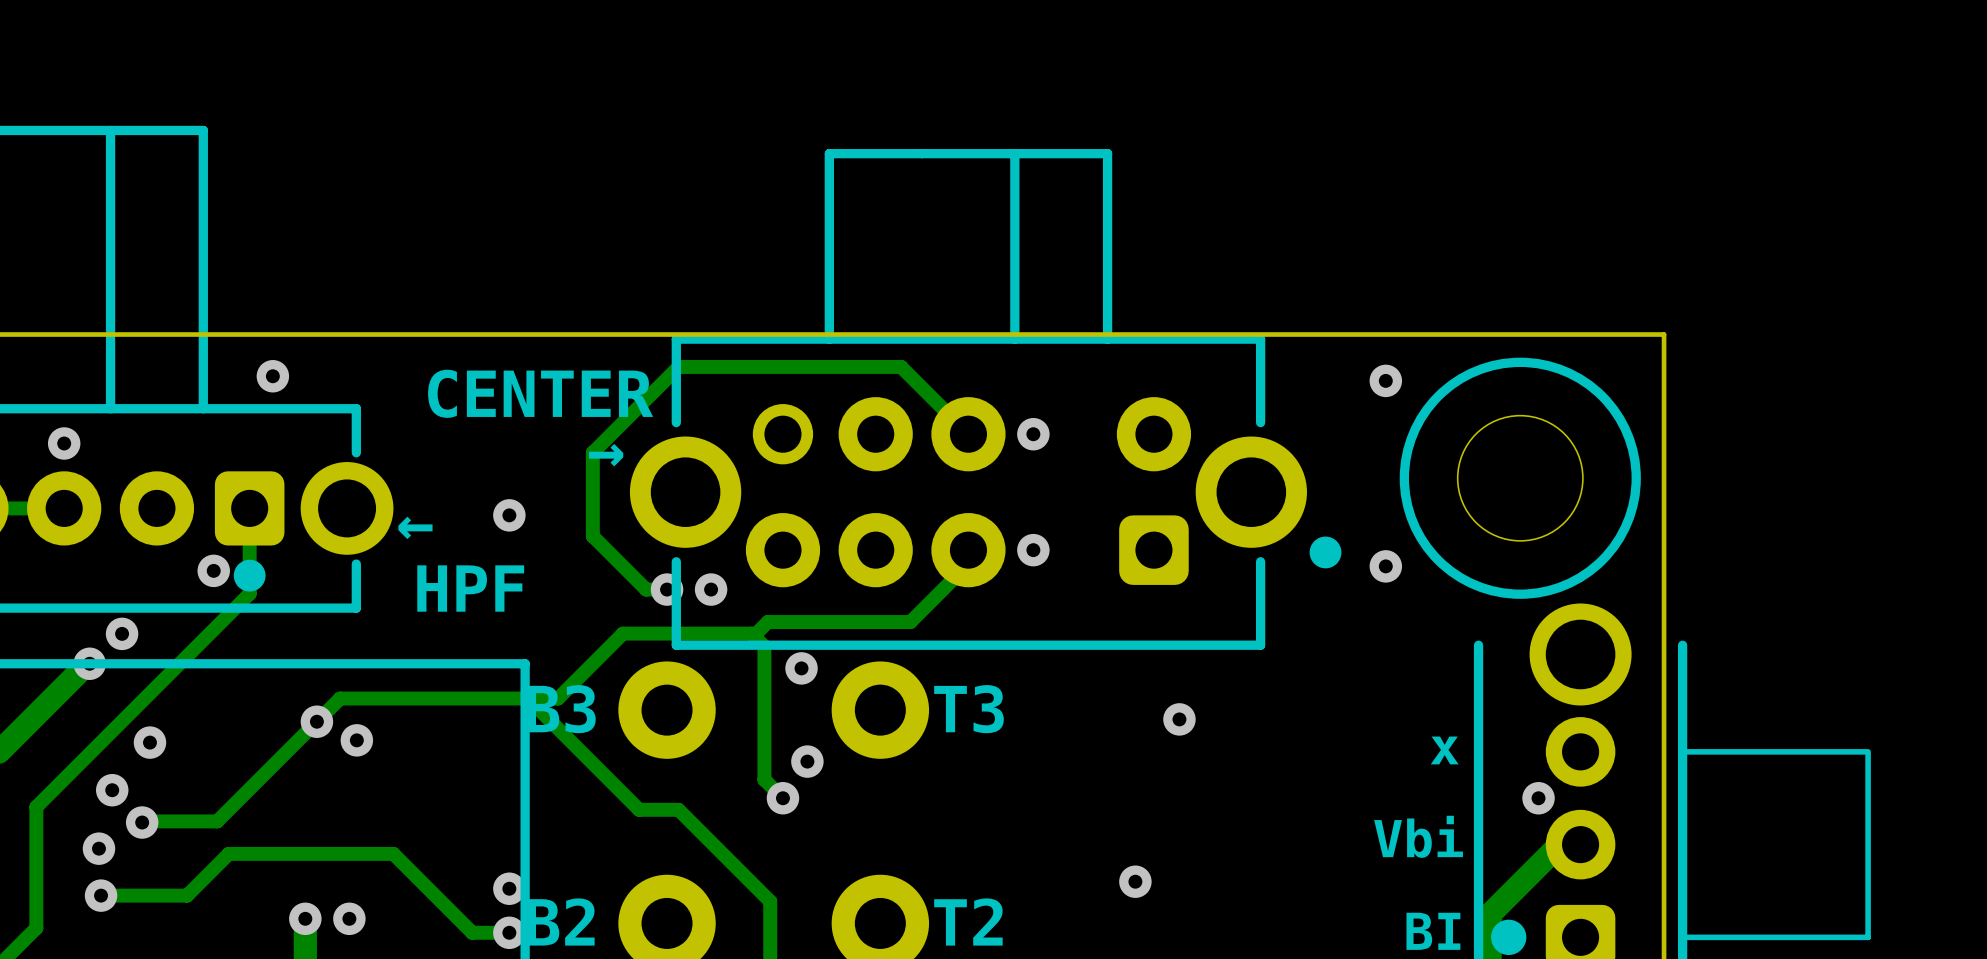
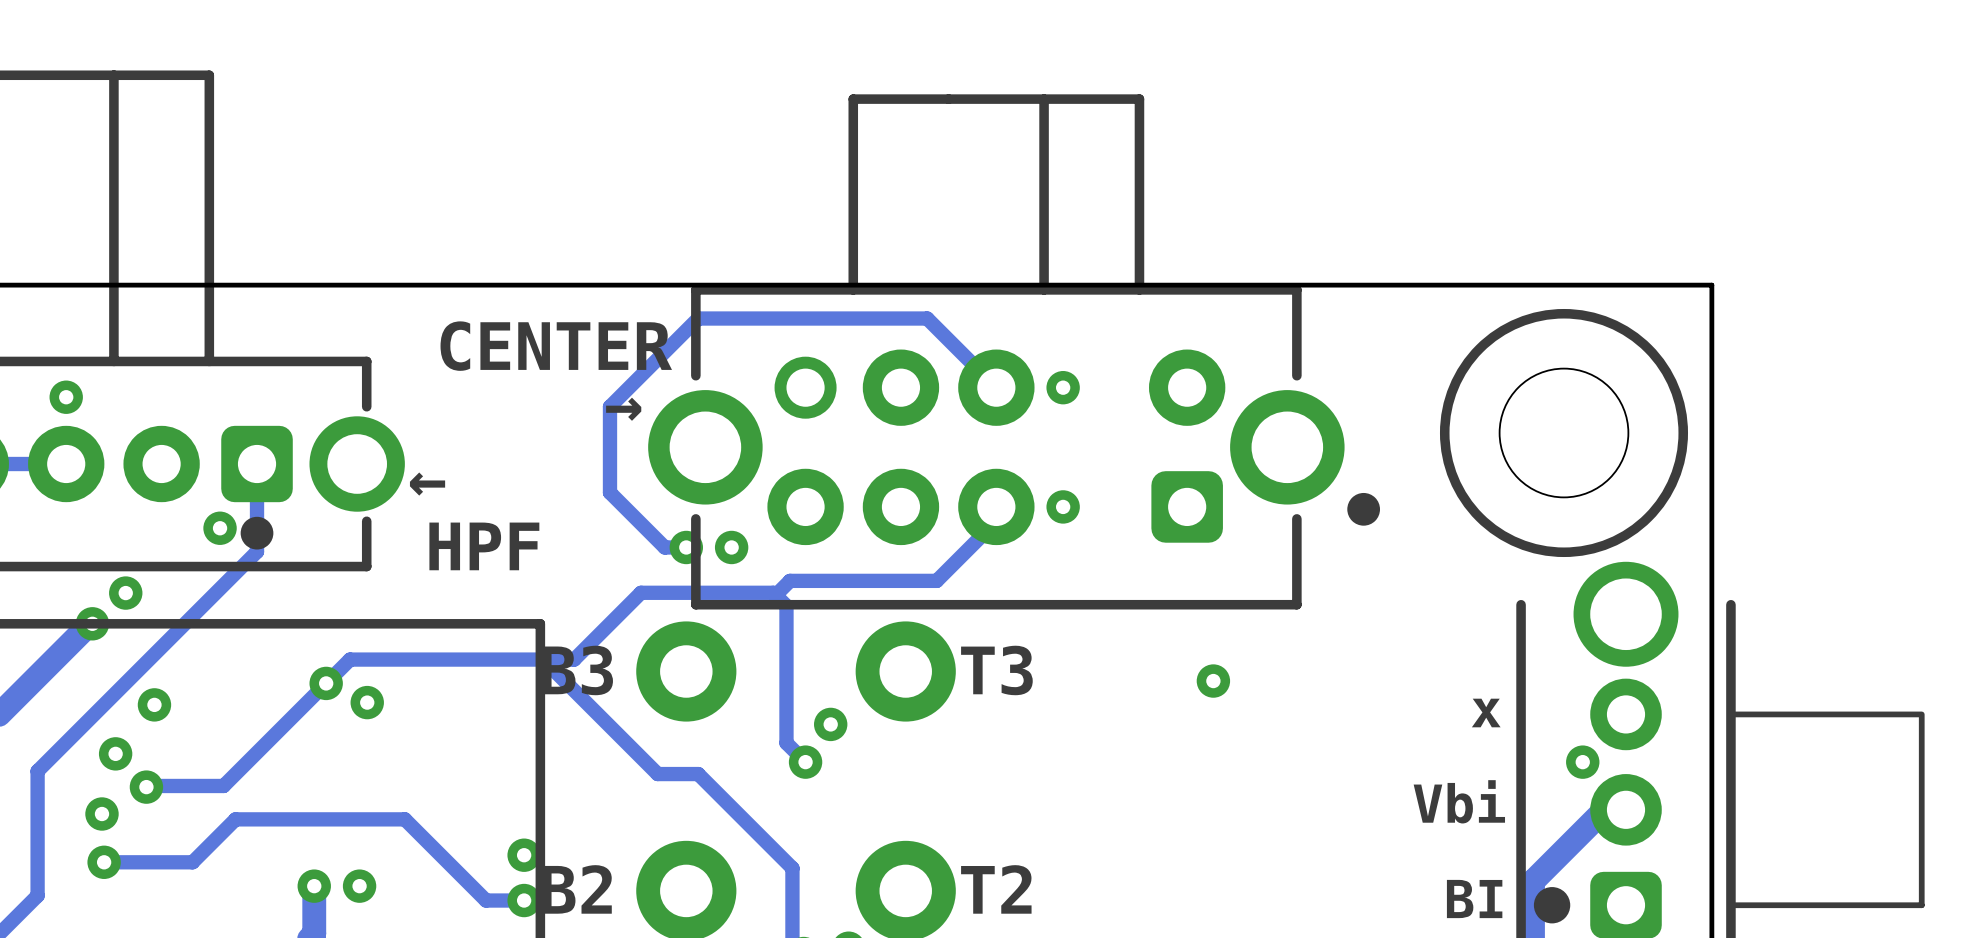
via: (272, 376) -> none
via: (1385, 380) -> none
via: (509, 515) -> none
via: (1385, 566) -> none
via: (801, 668) -> none
via: (1135, 881) -> none

